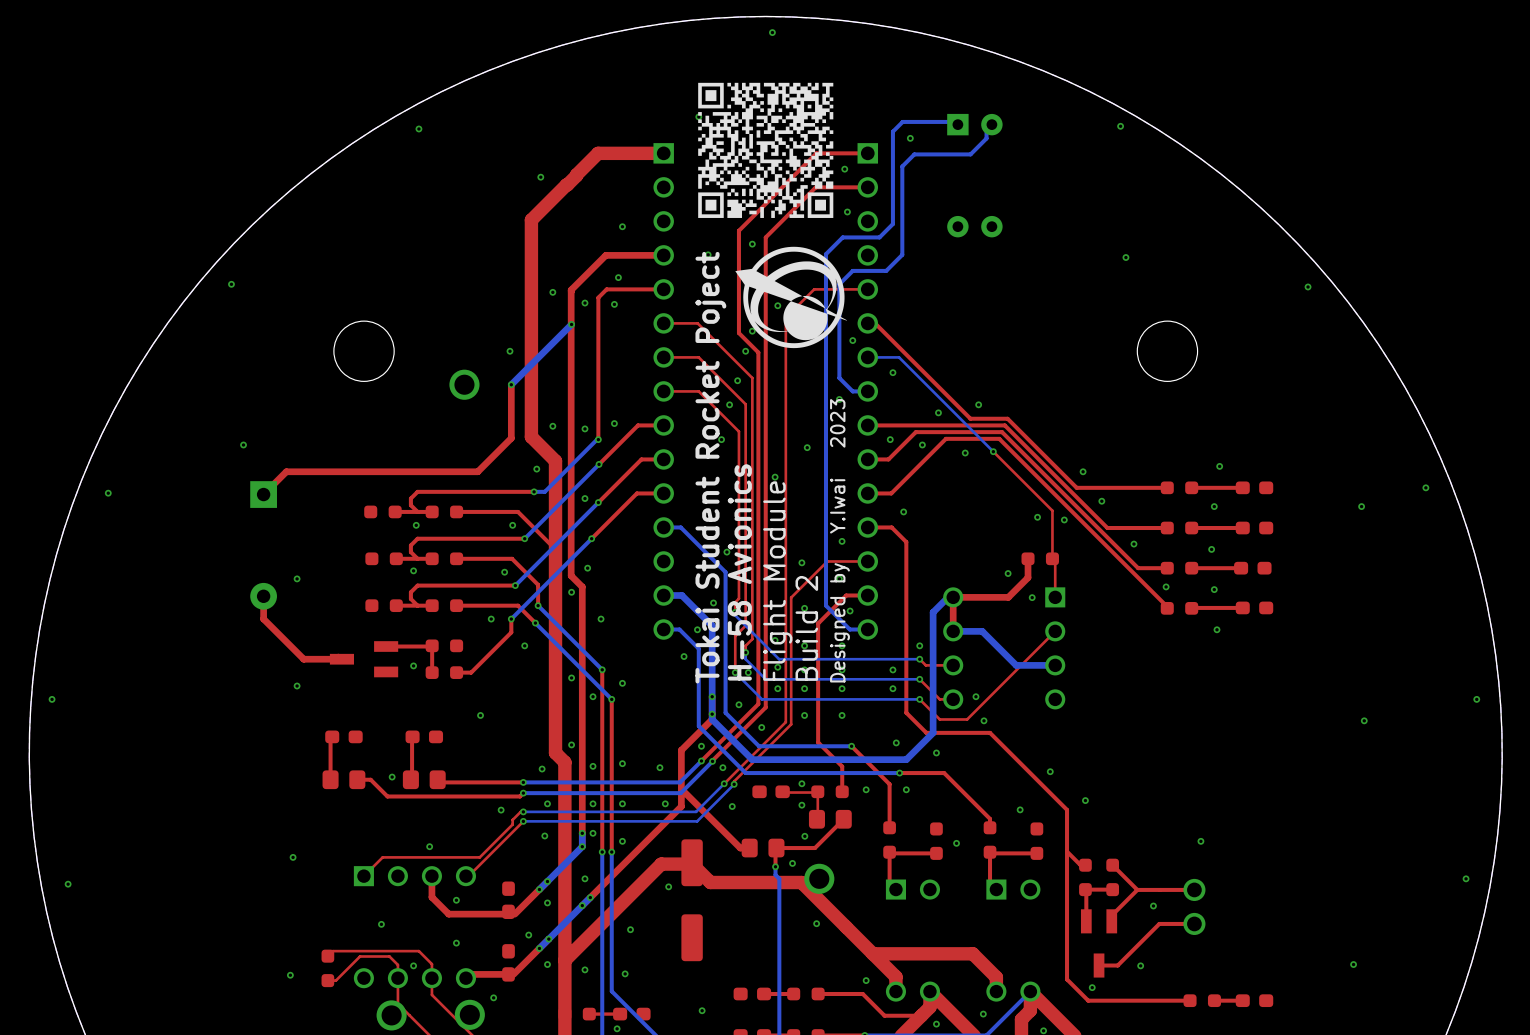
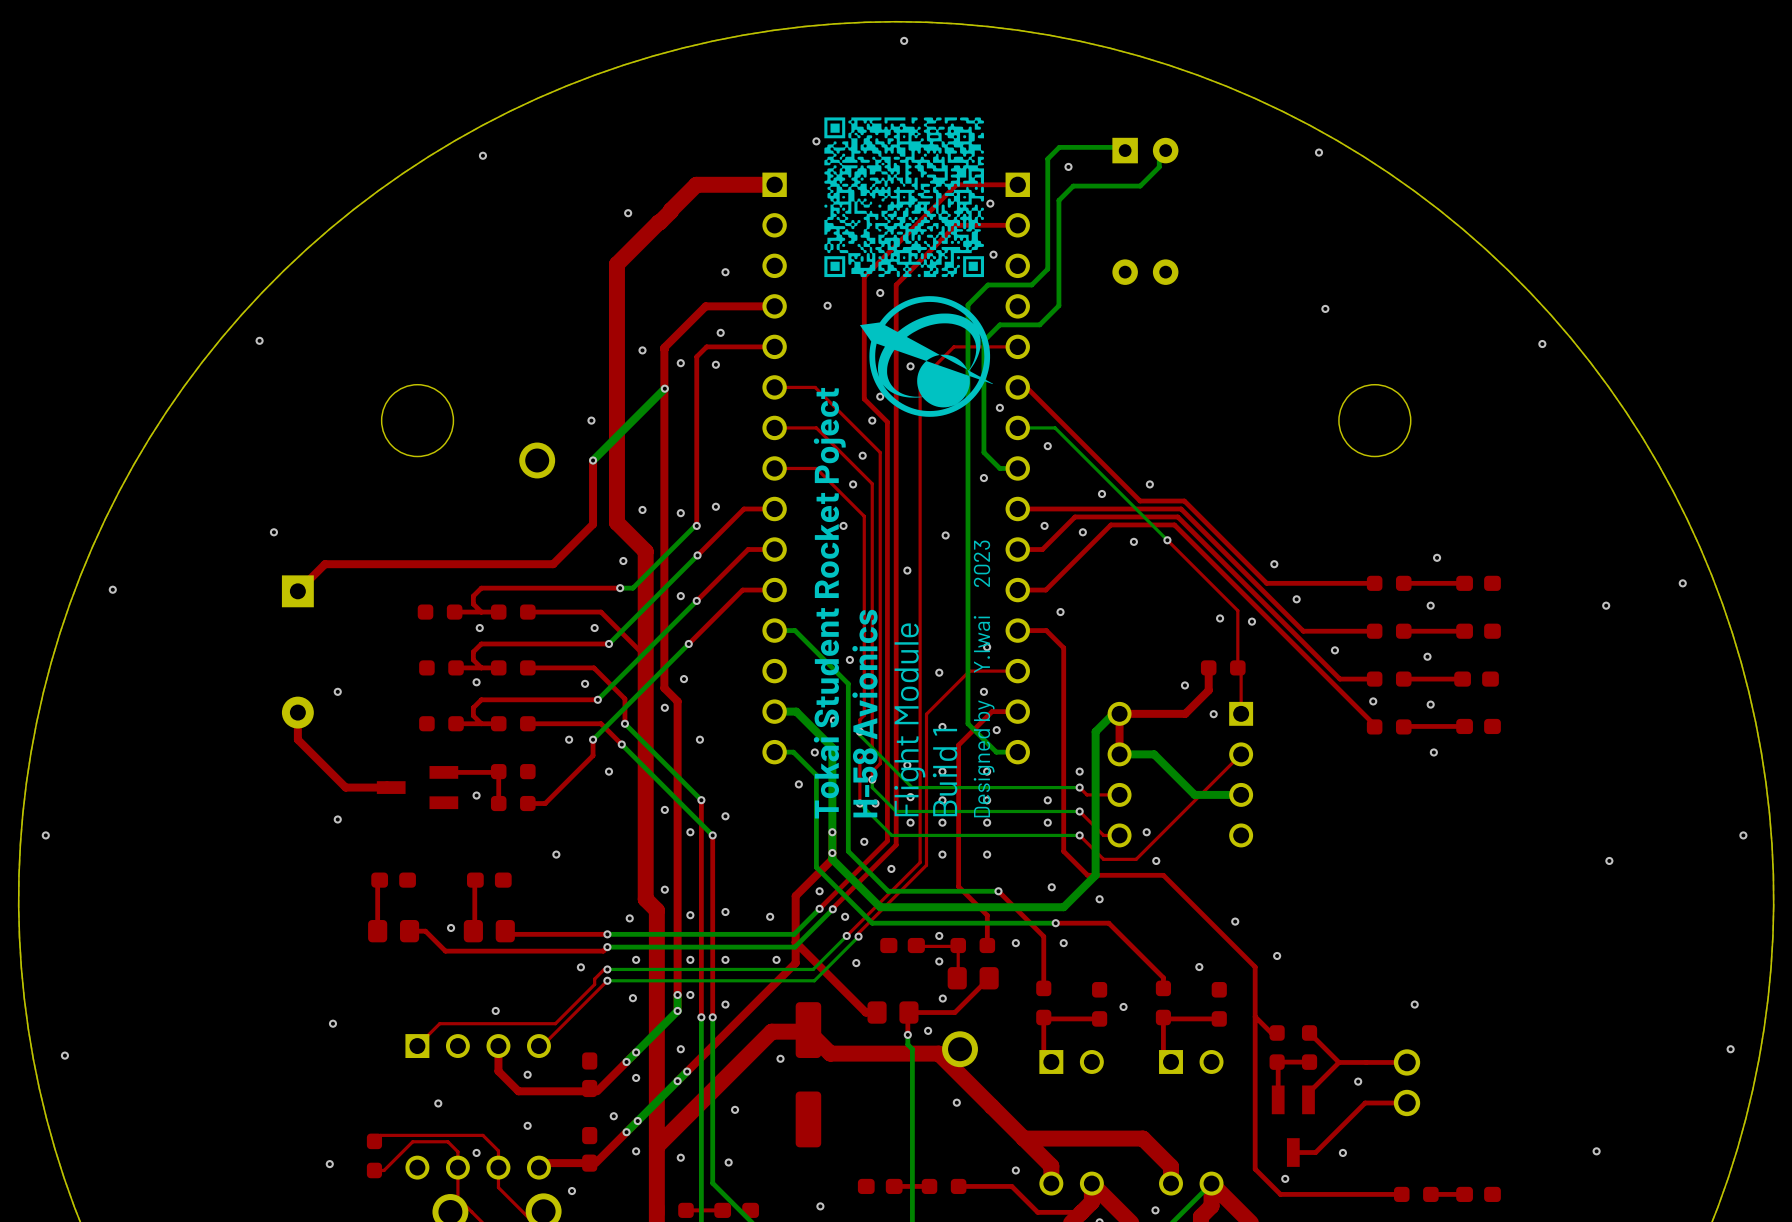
drawing: [698, 82, 834, 218] -> none
drawing: none -> [824, 117, 984, 278]
text: Build 2 (806, 628) -> Build 1 (945, 772)

